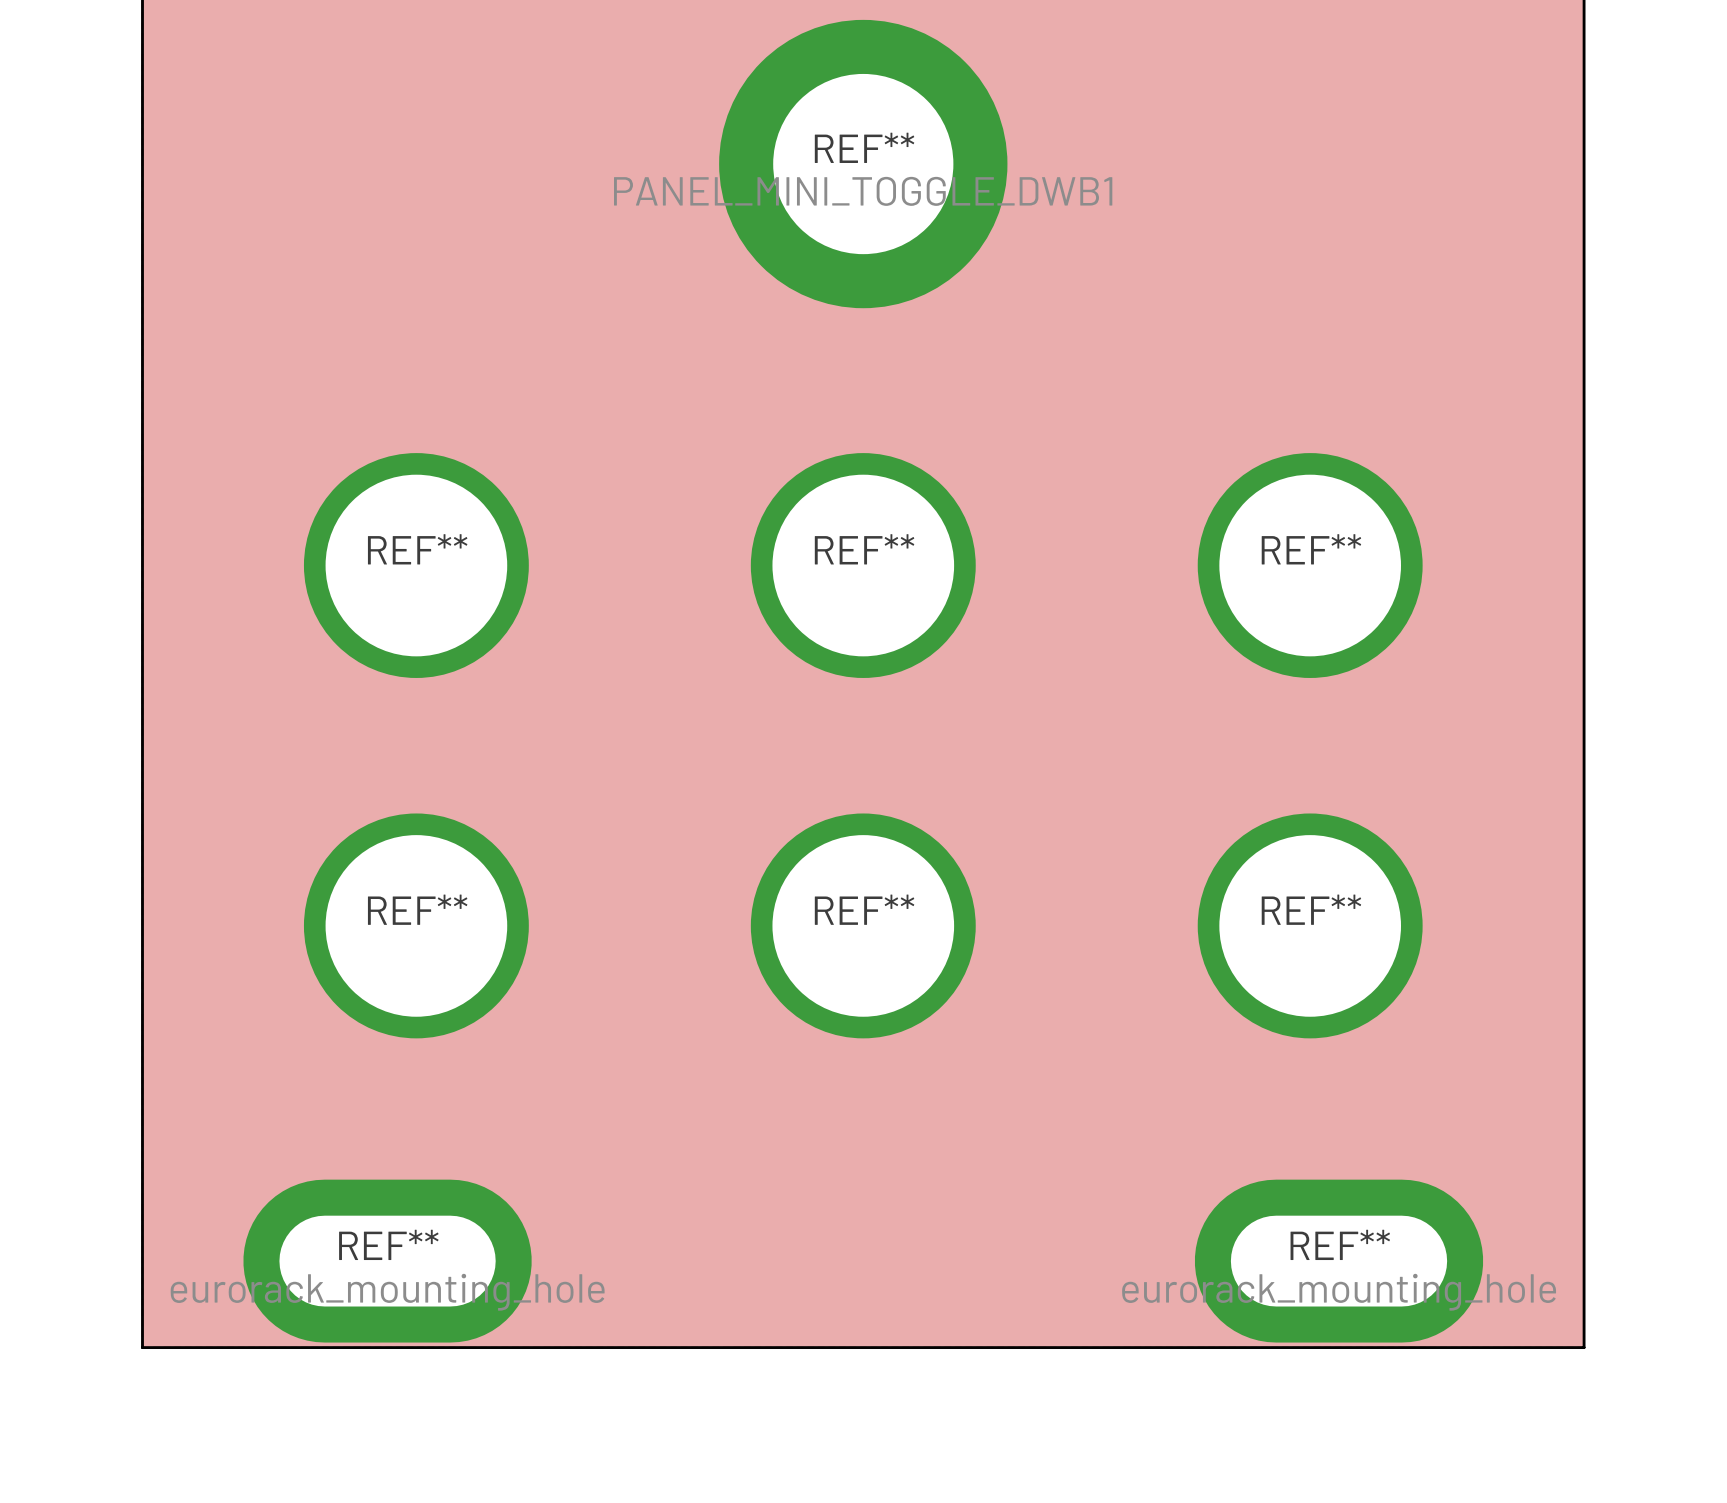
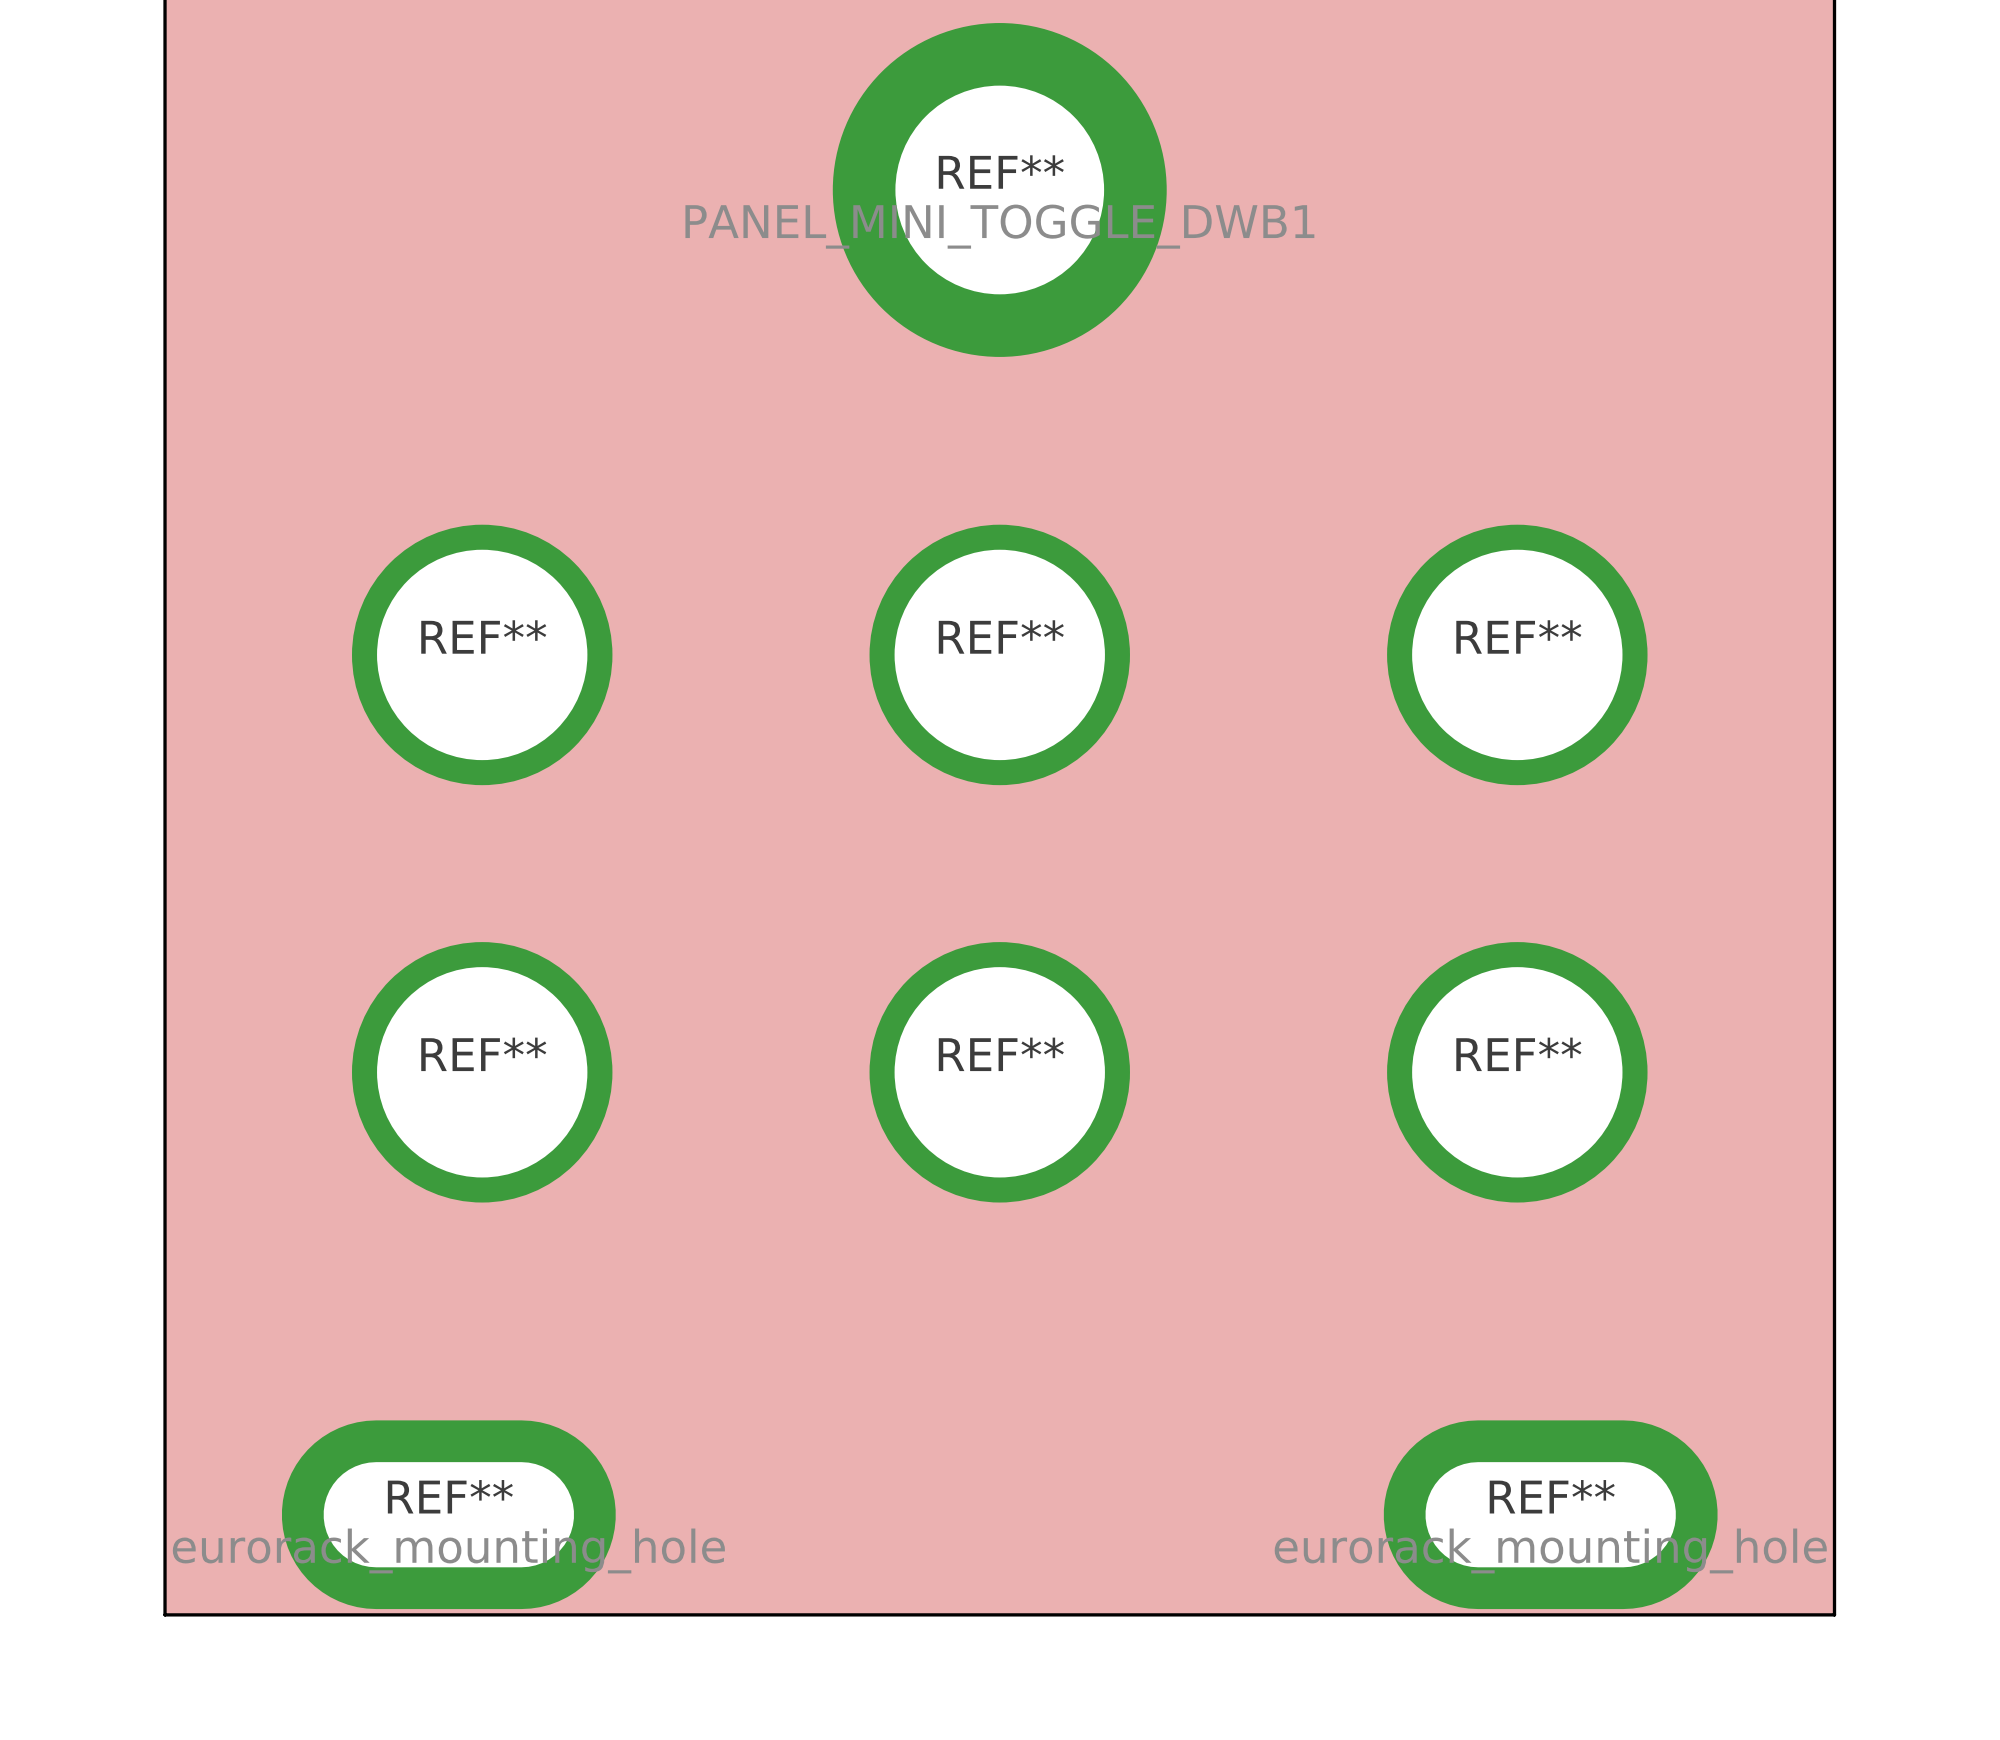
REF** position: (387, 1261) -> (448, 1514)
REF** position: (1339, 1261) -> (1550, 1514)
board edge: (142, 1347) (1584, 1347) -> (165, 1560) (165, 1614) (1834, 1614) (1834, 1560)

